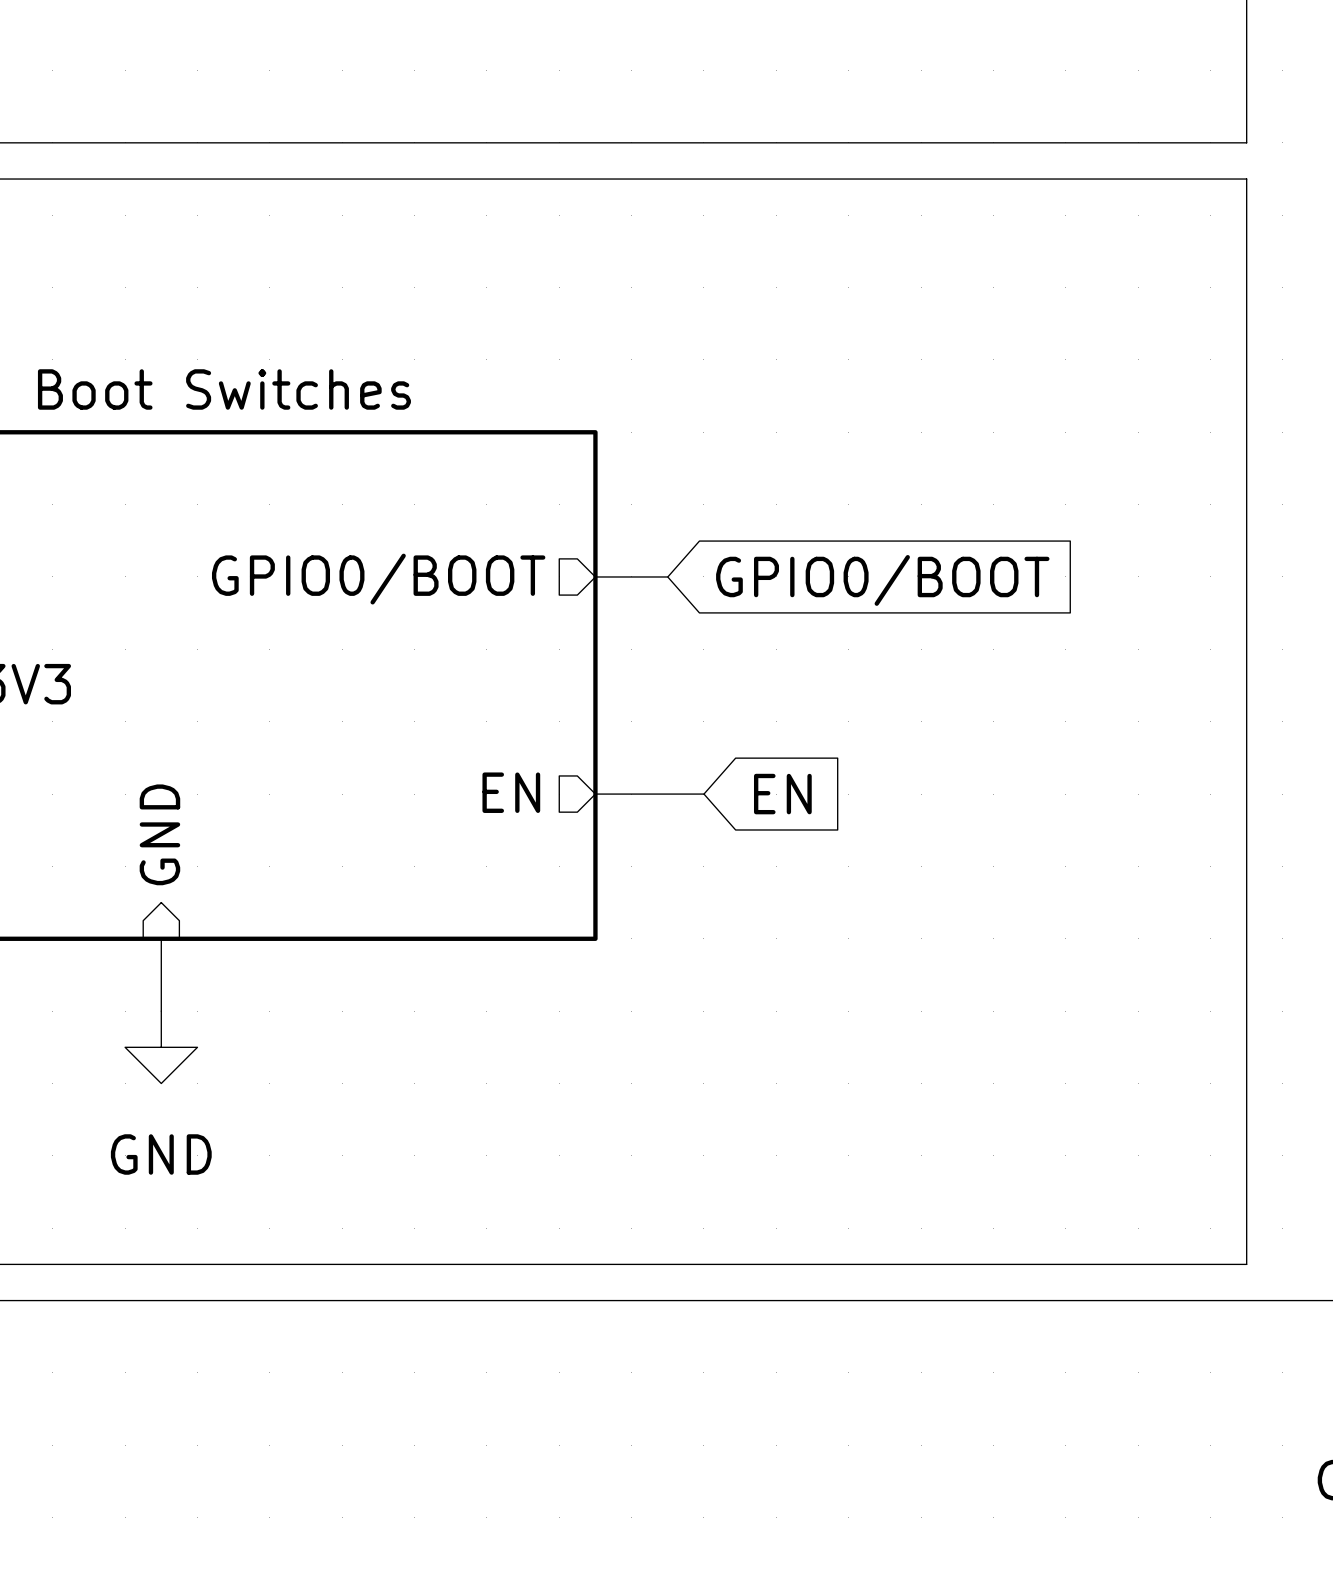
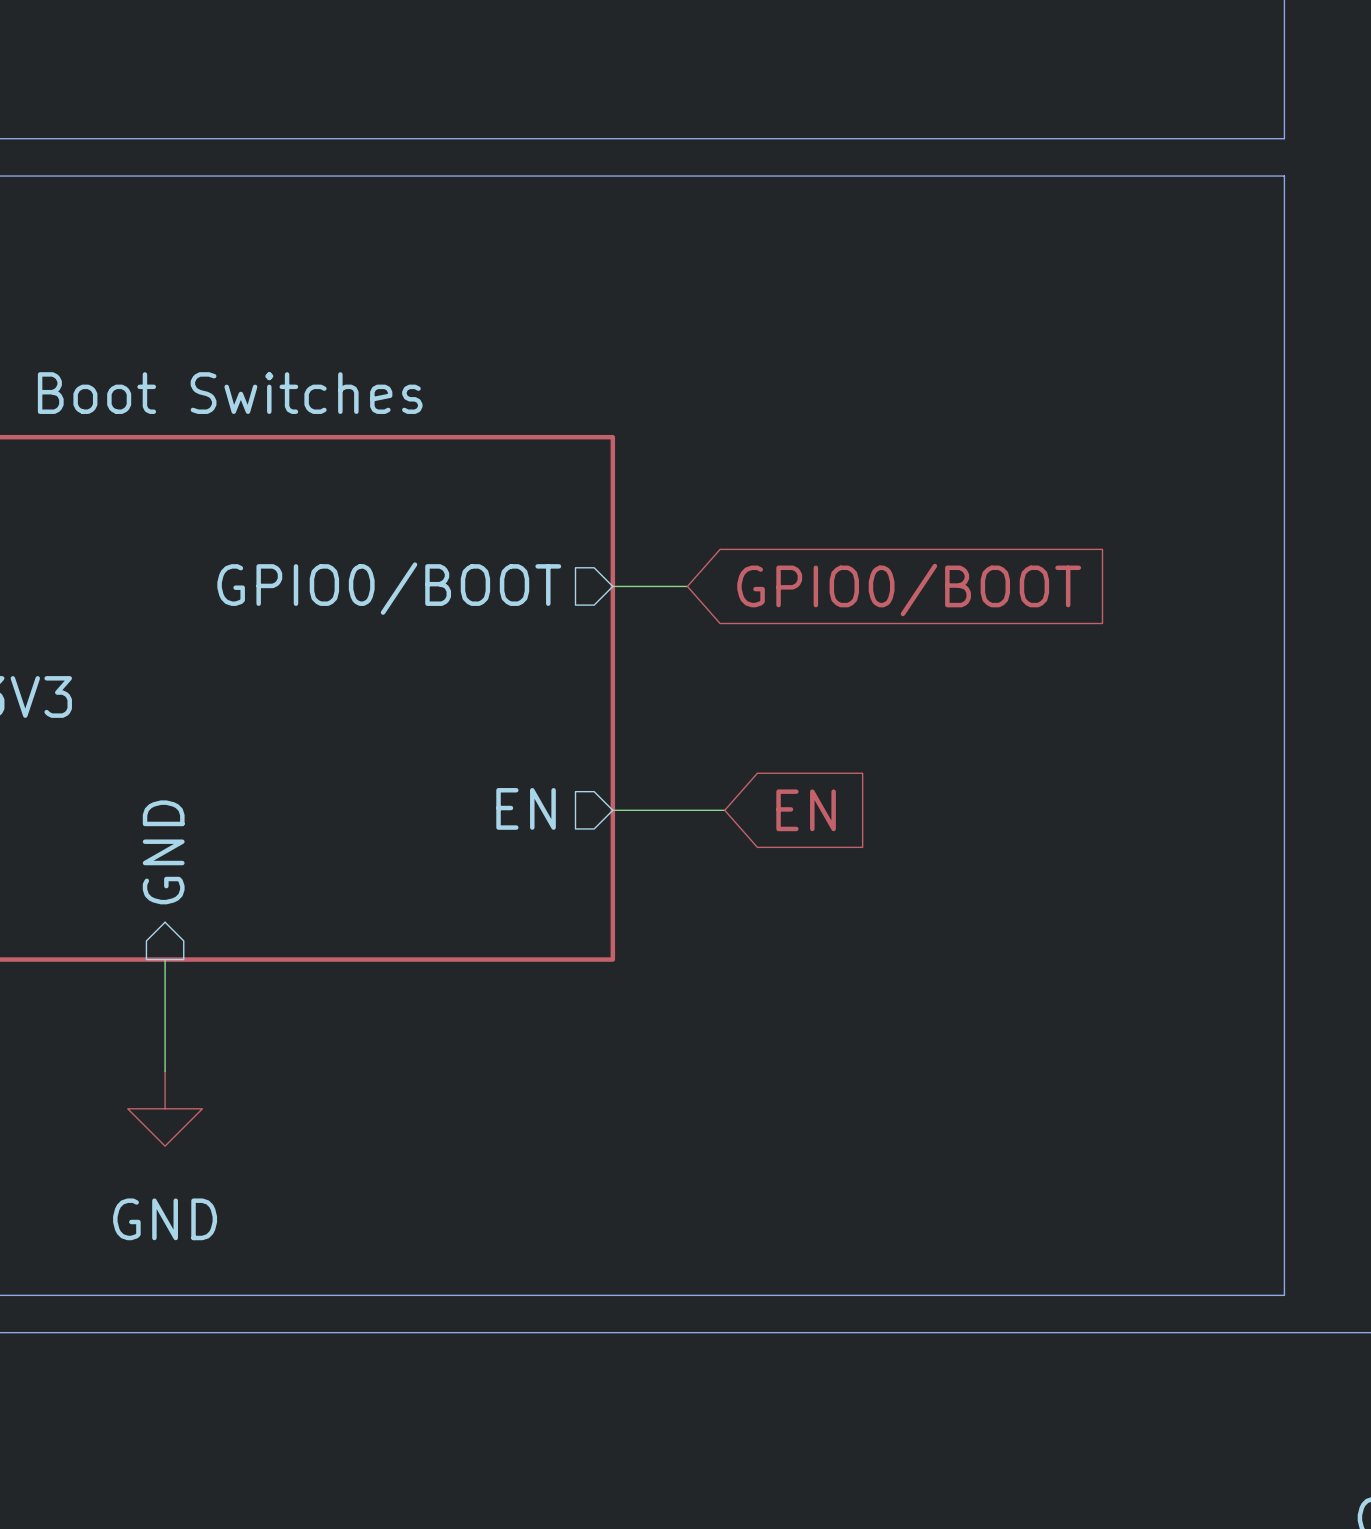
power symbol position: GND (161, 1047) -> GND (165, 1108)

